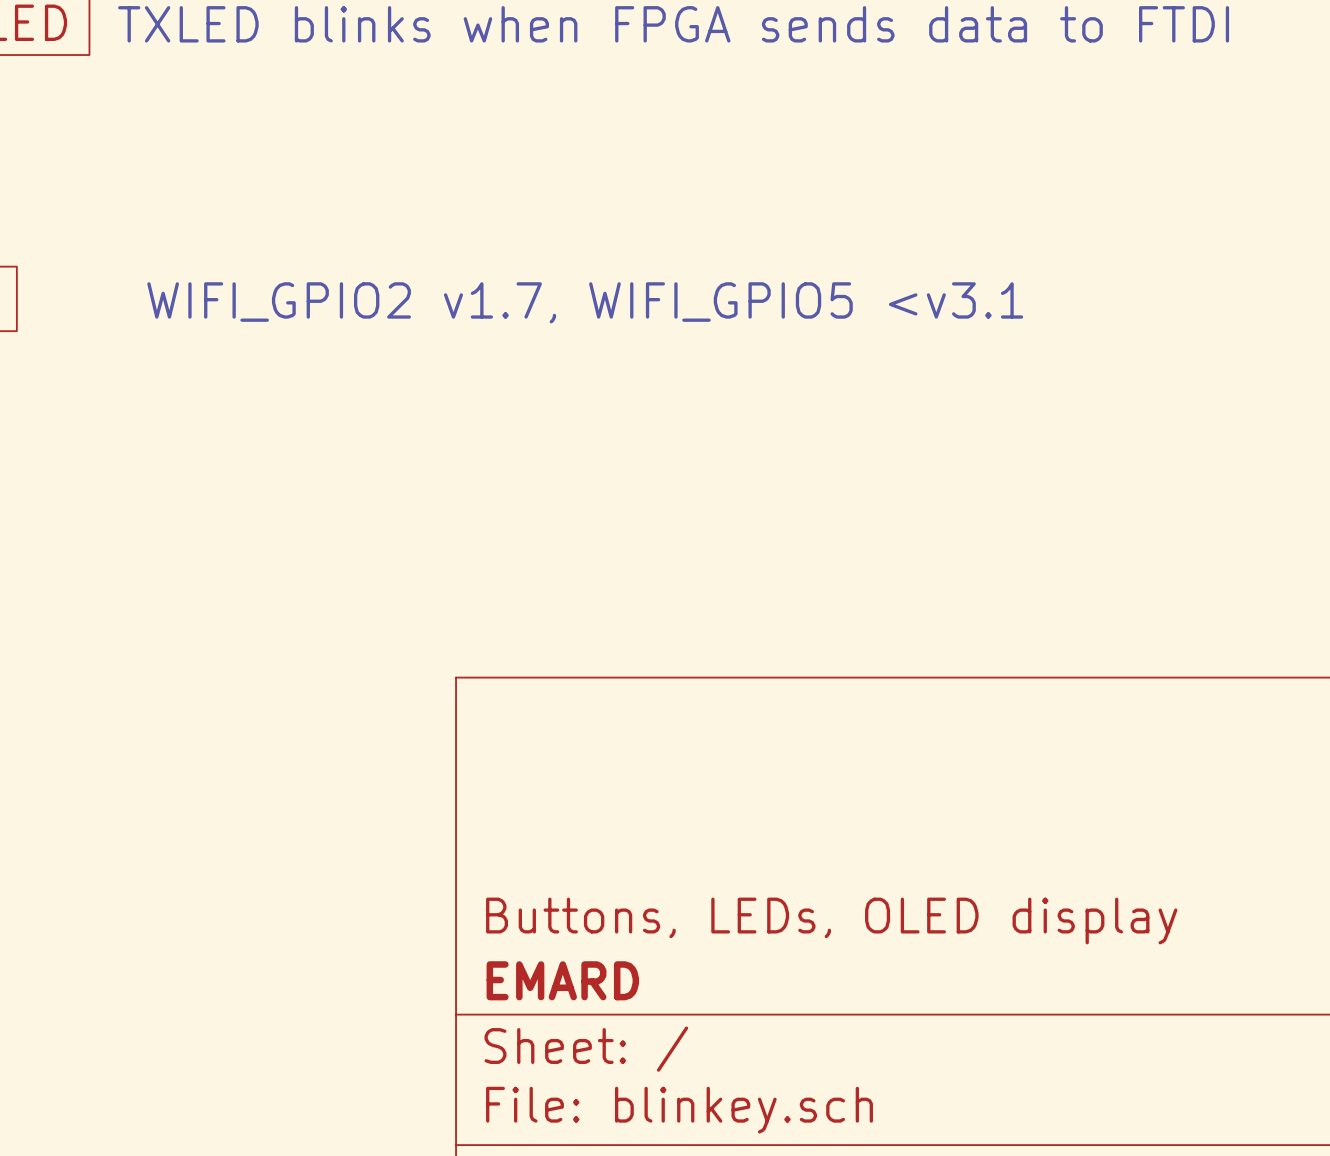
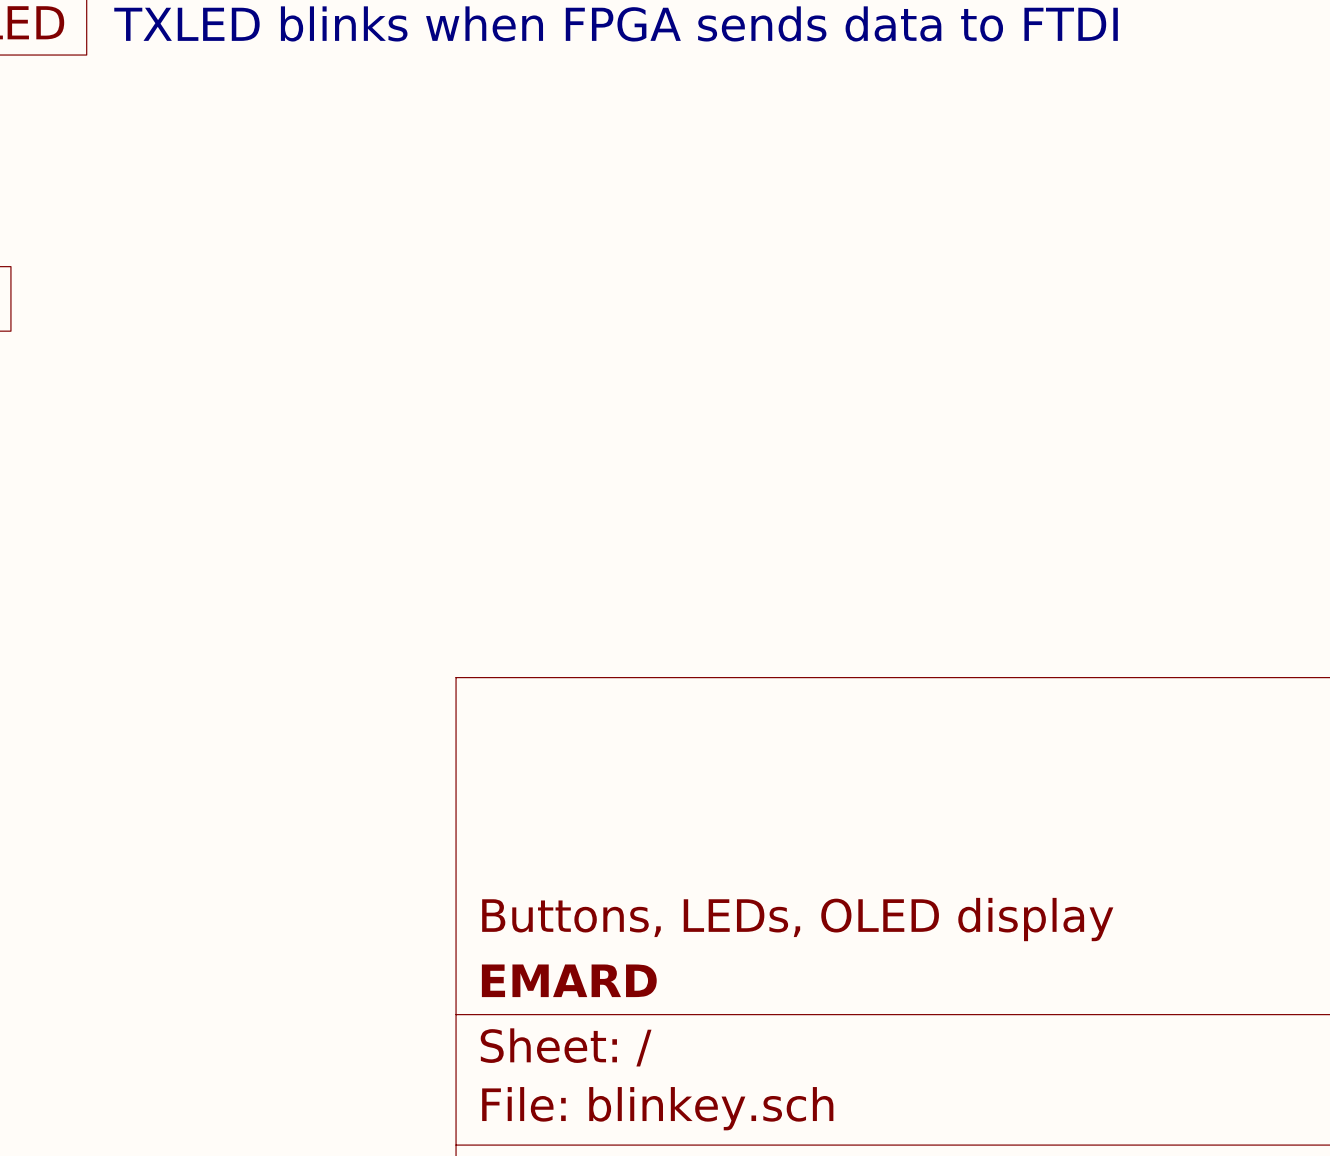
text: WIFI_GPIO2 v1.7, WIFI_GPIO5 <v3.1 (585, 302) -> none

